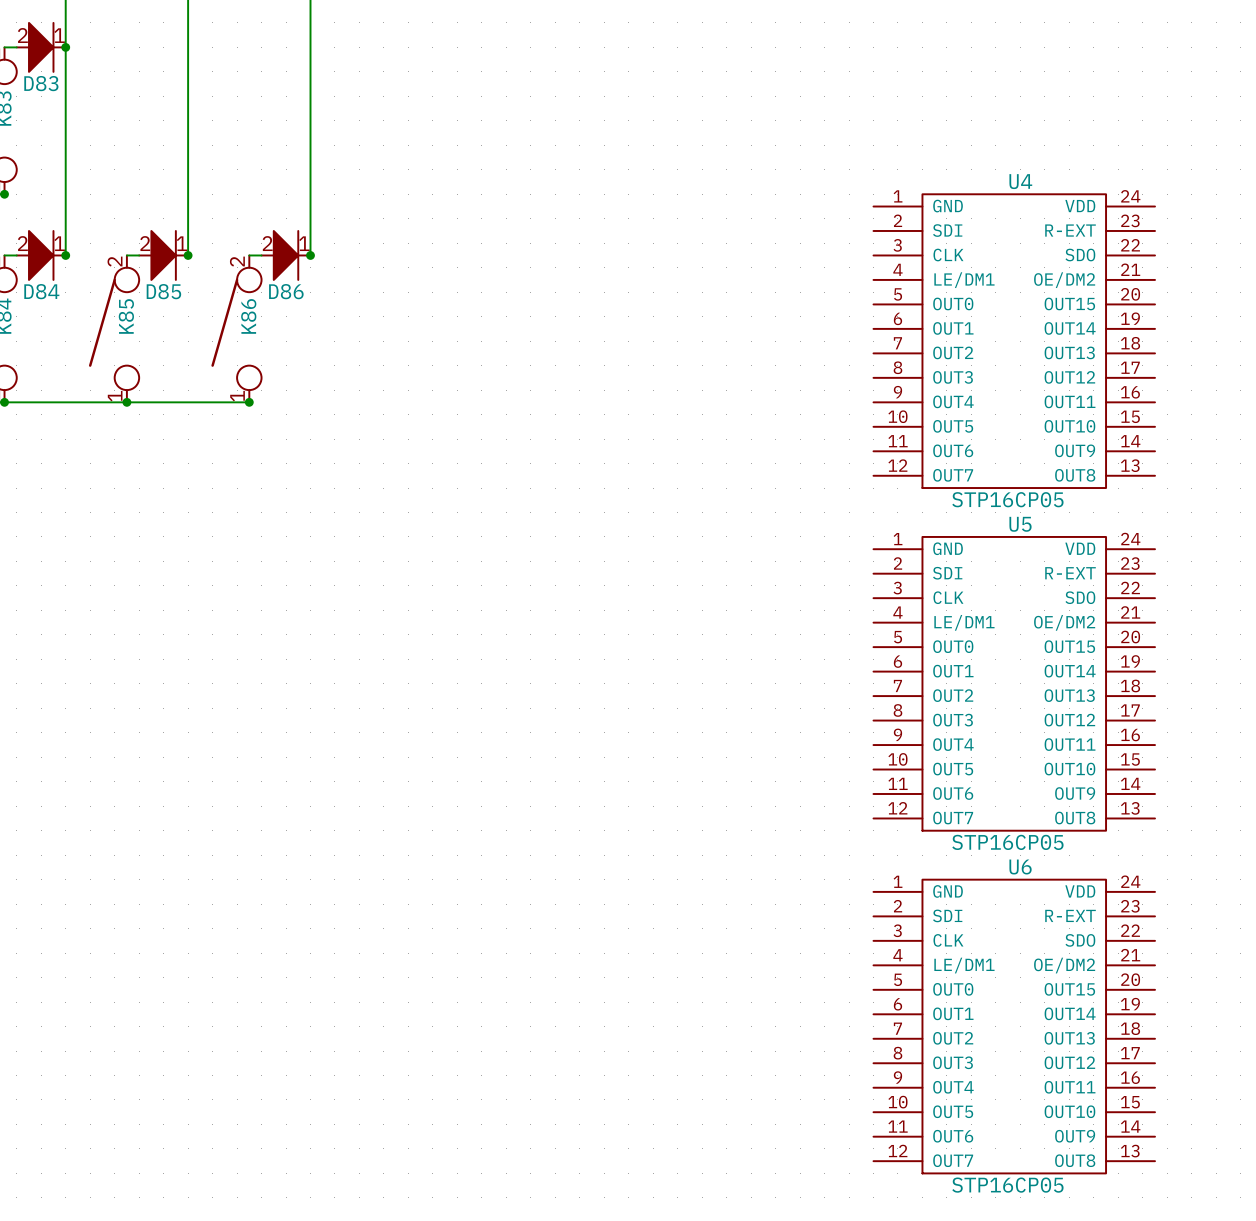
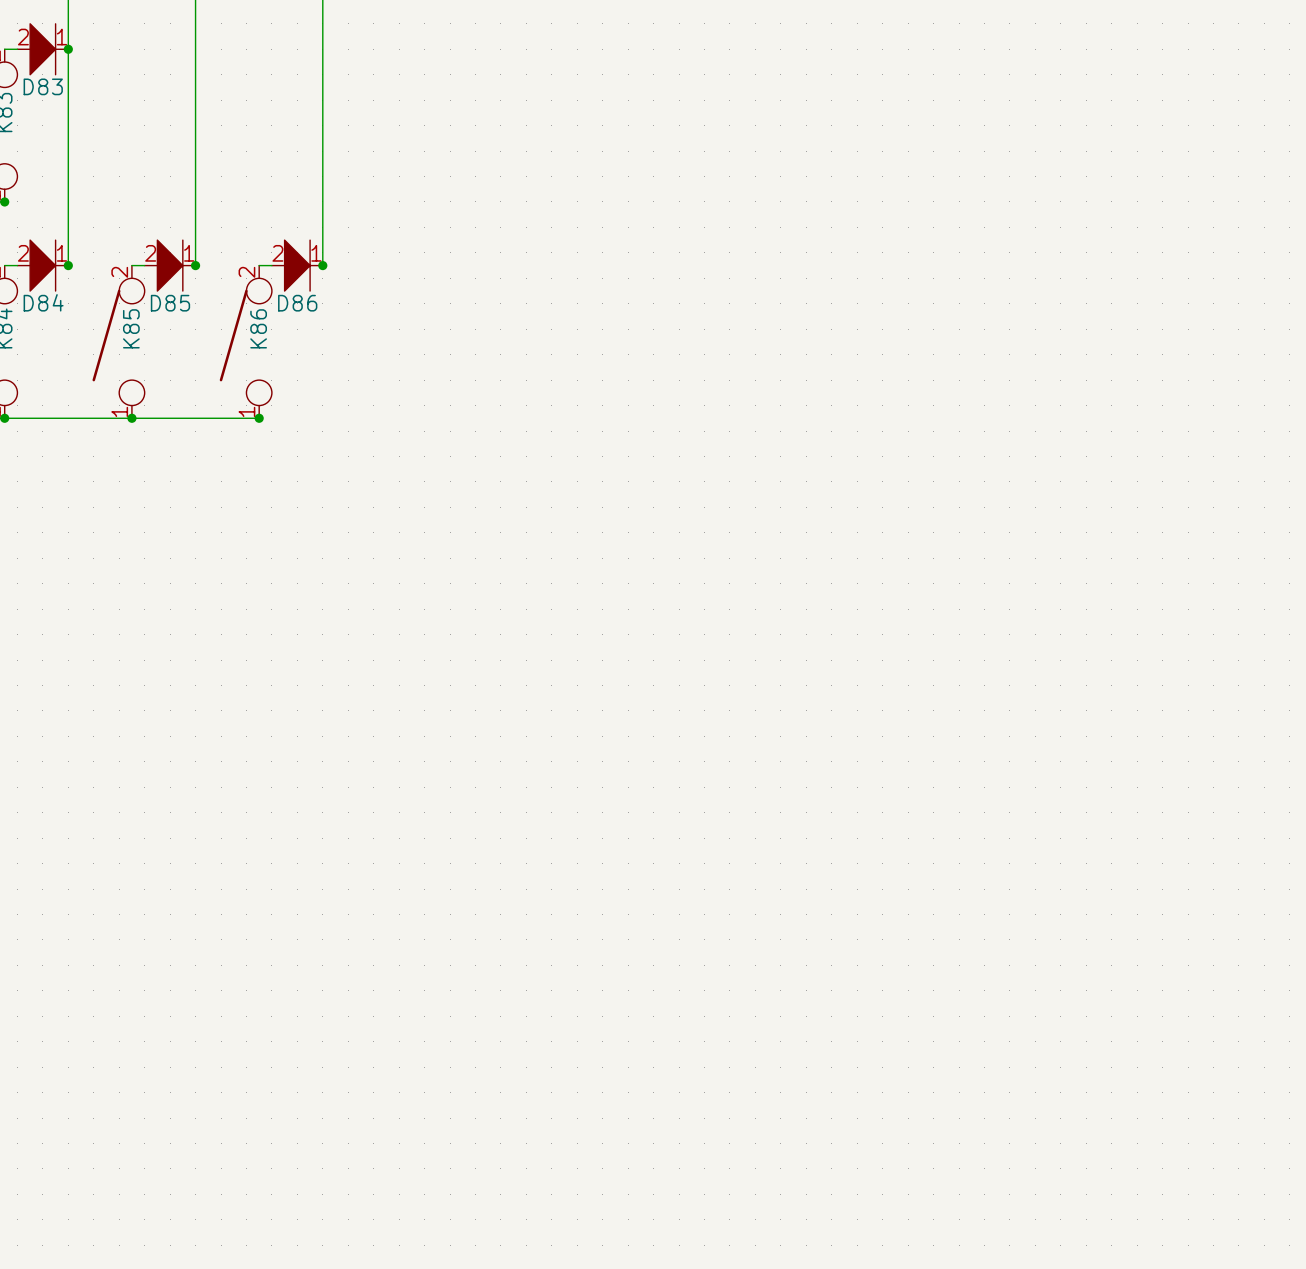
U4: STP16CP05 (1014, 341) -> none
U5: STP16CP05 (1014, 683) -> none
U6: STP16CP05 (1014, 1026) -> none

